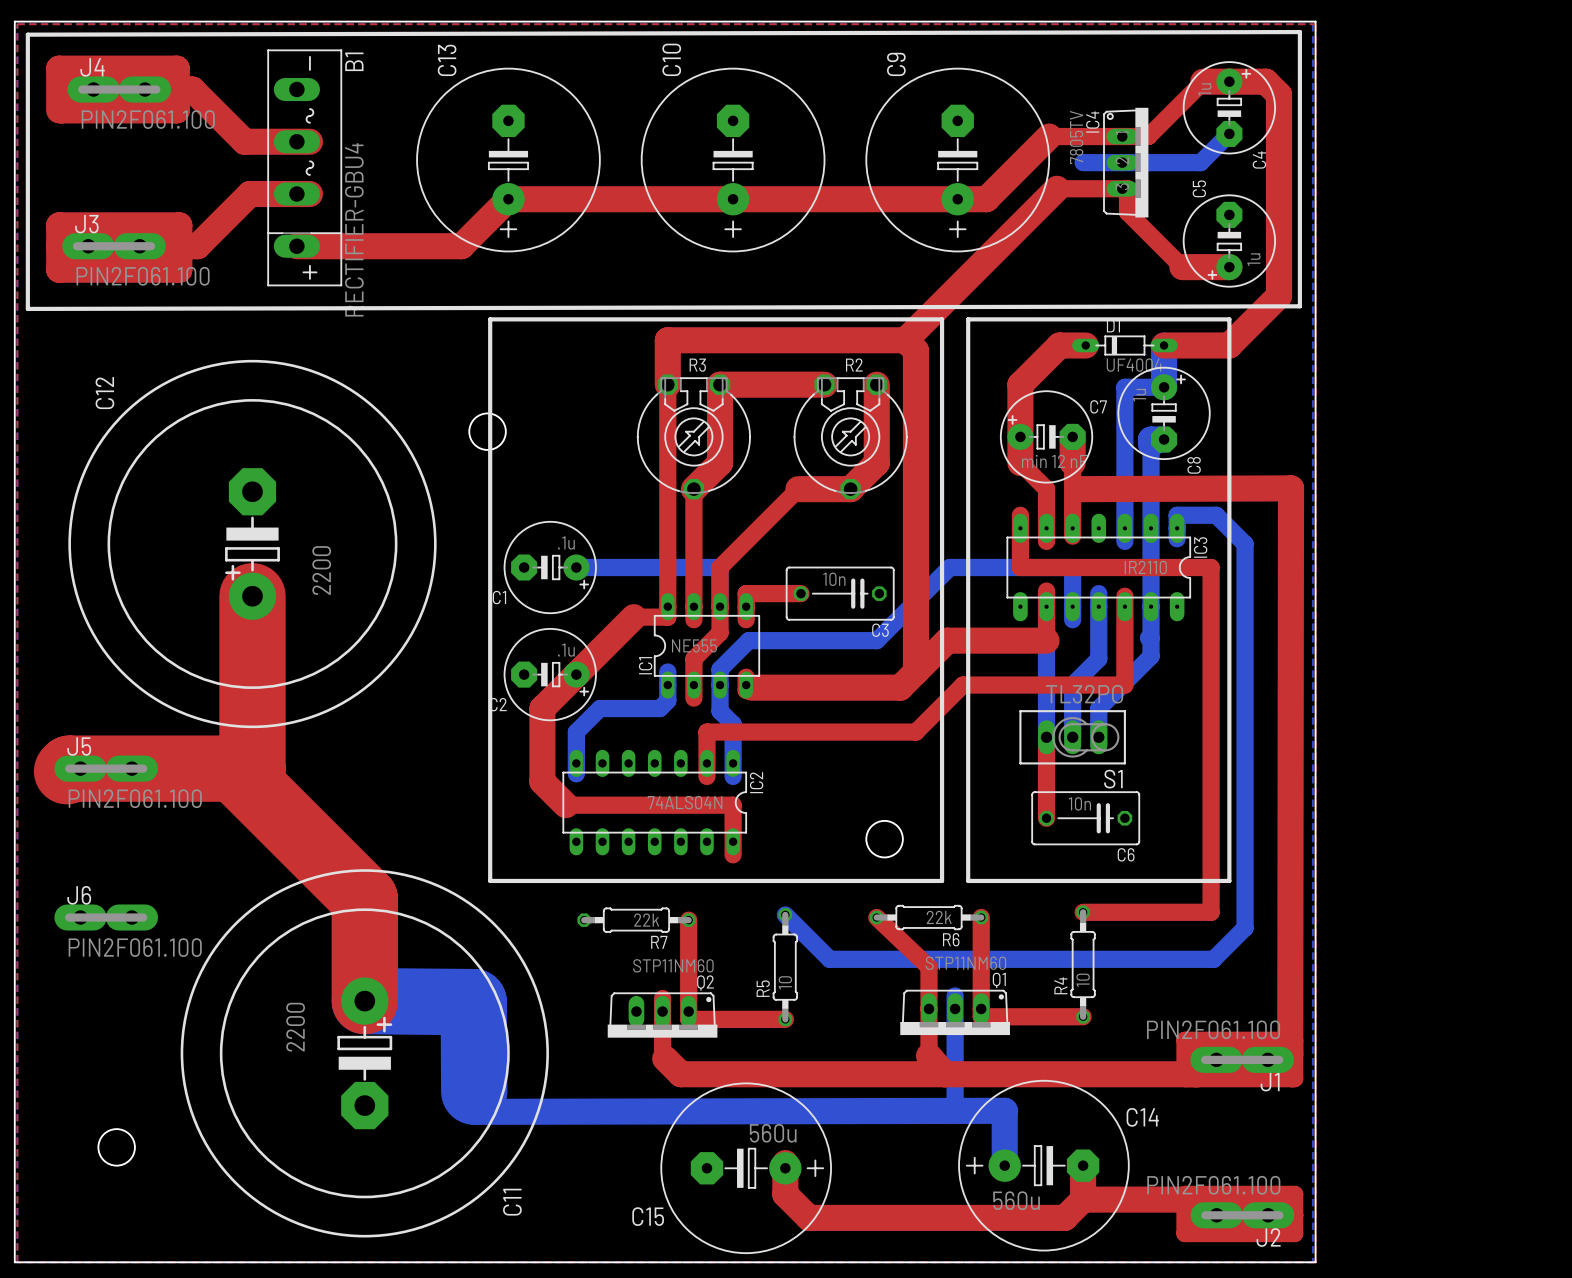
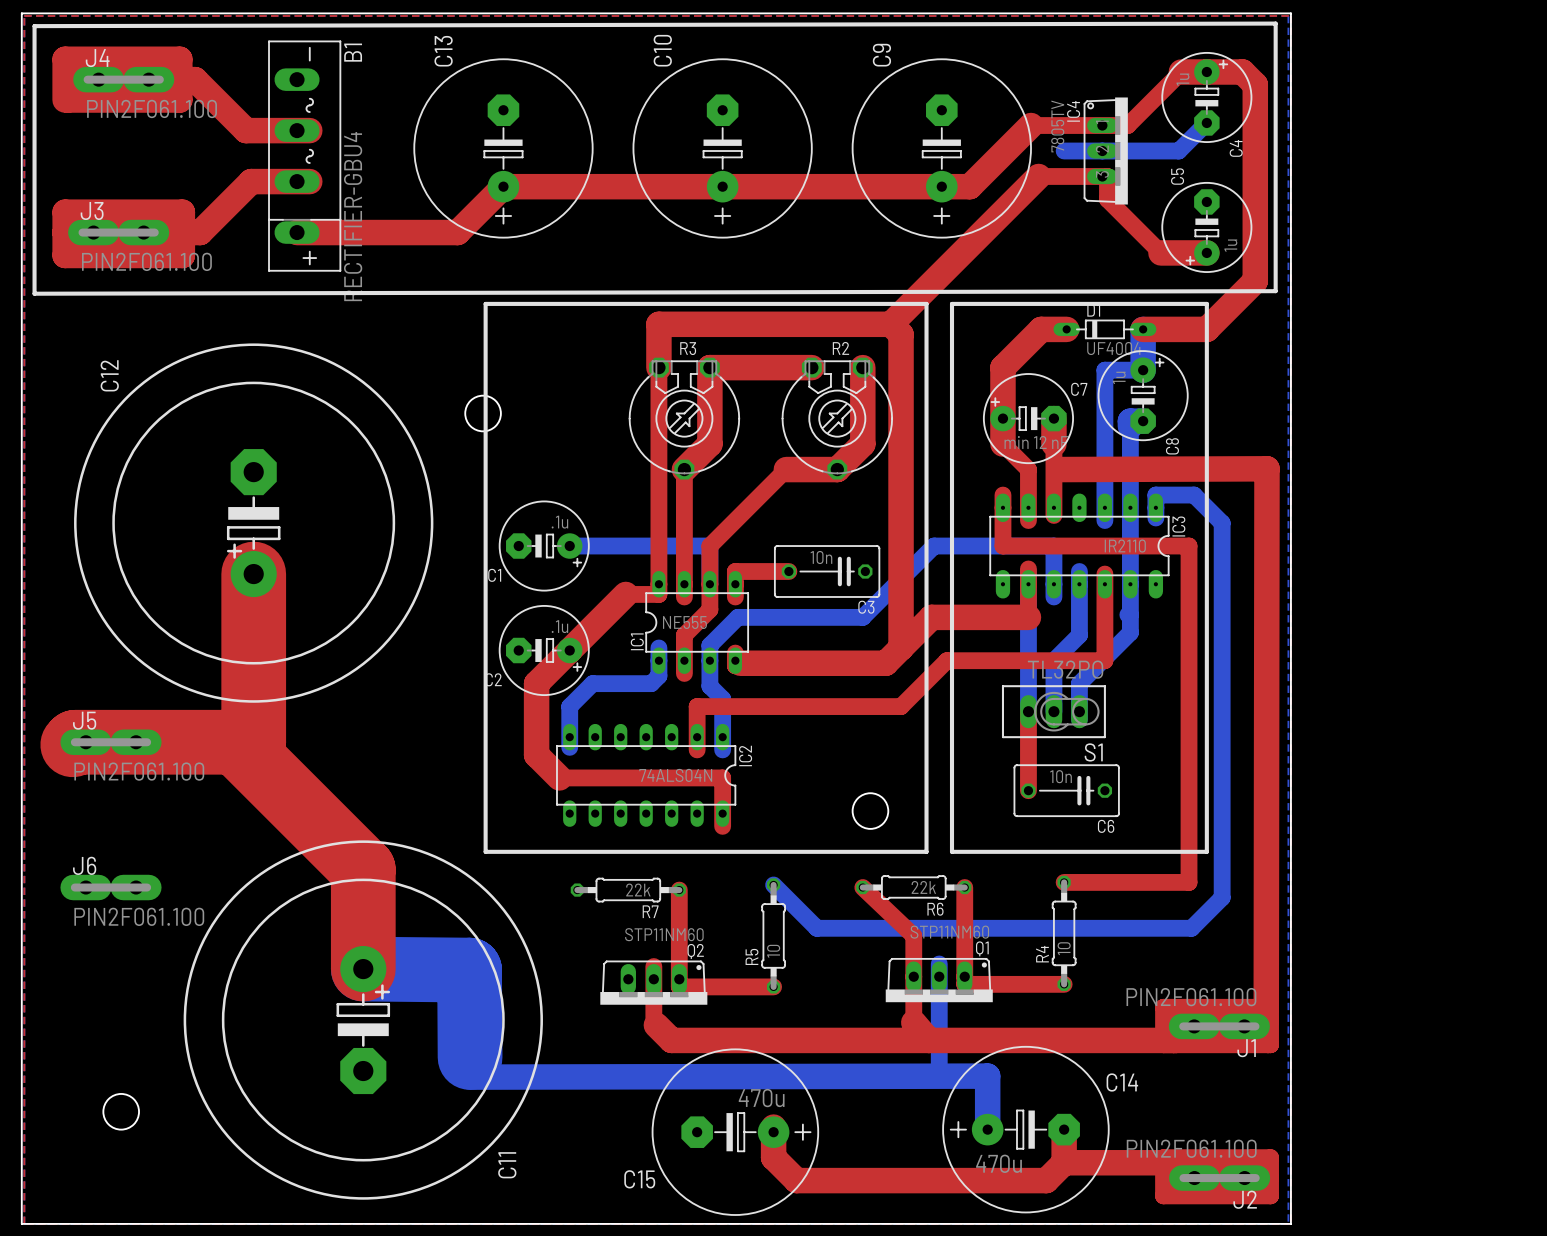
C12 value: 2200 (321, 570) -> none
C11 value: 2200 (295, 1027) -> none
C15 value: 560u (773, 1133) -> 470u (761, 1098)
C14 value: 560u (1016, 1200) -> 470u (998, 1163)

